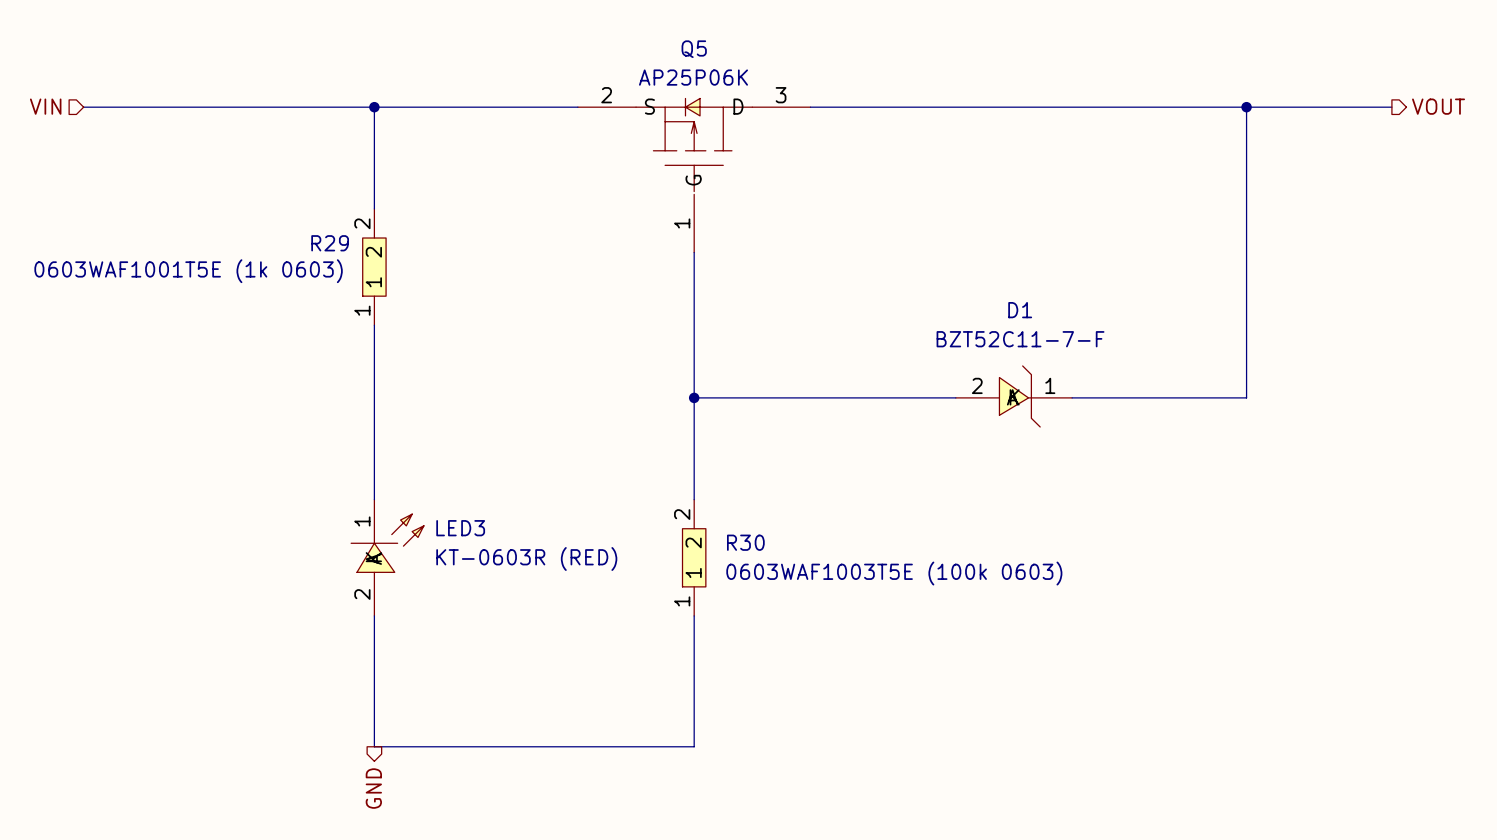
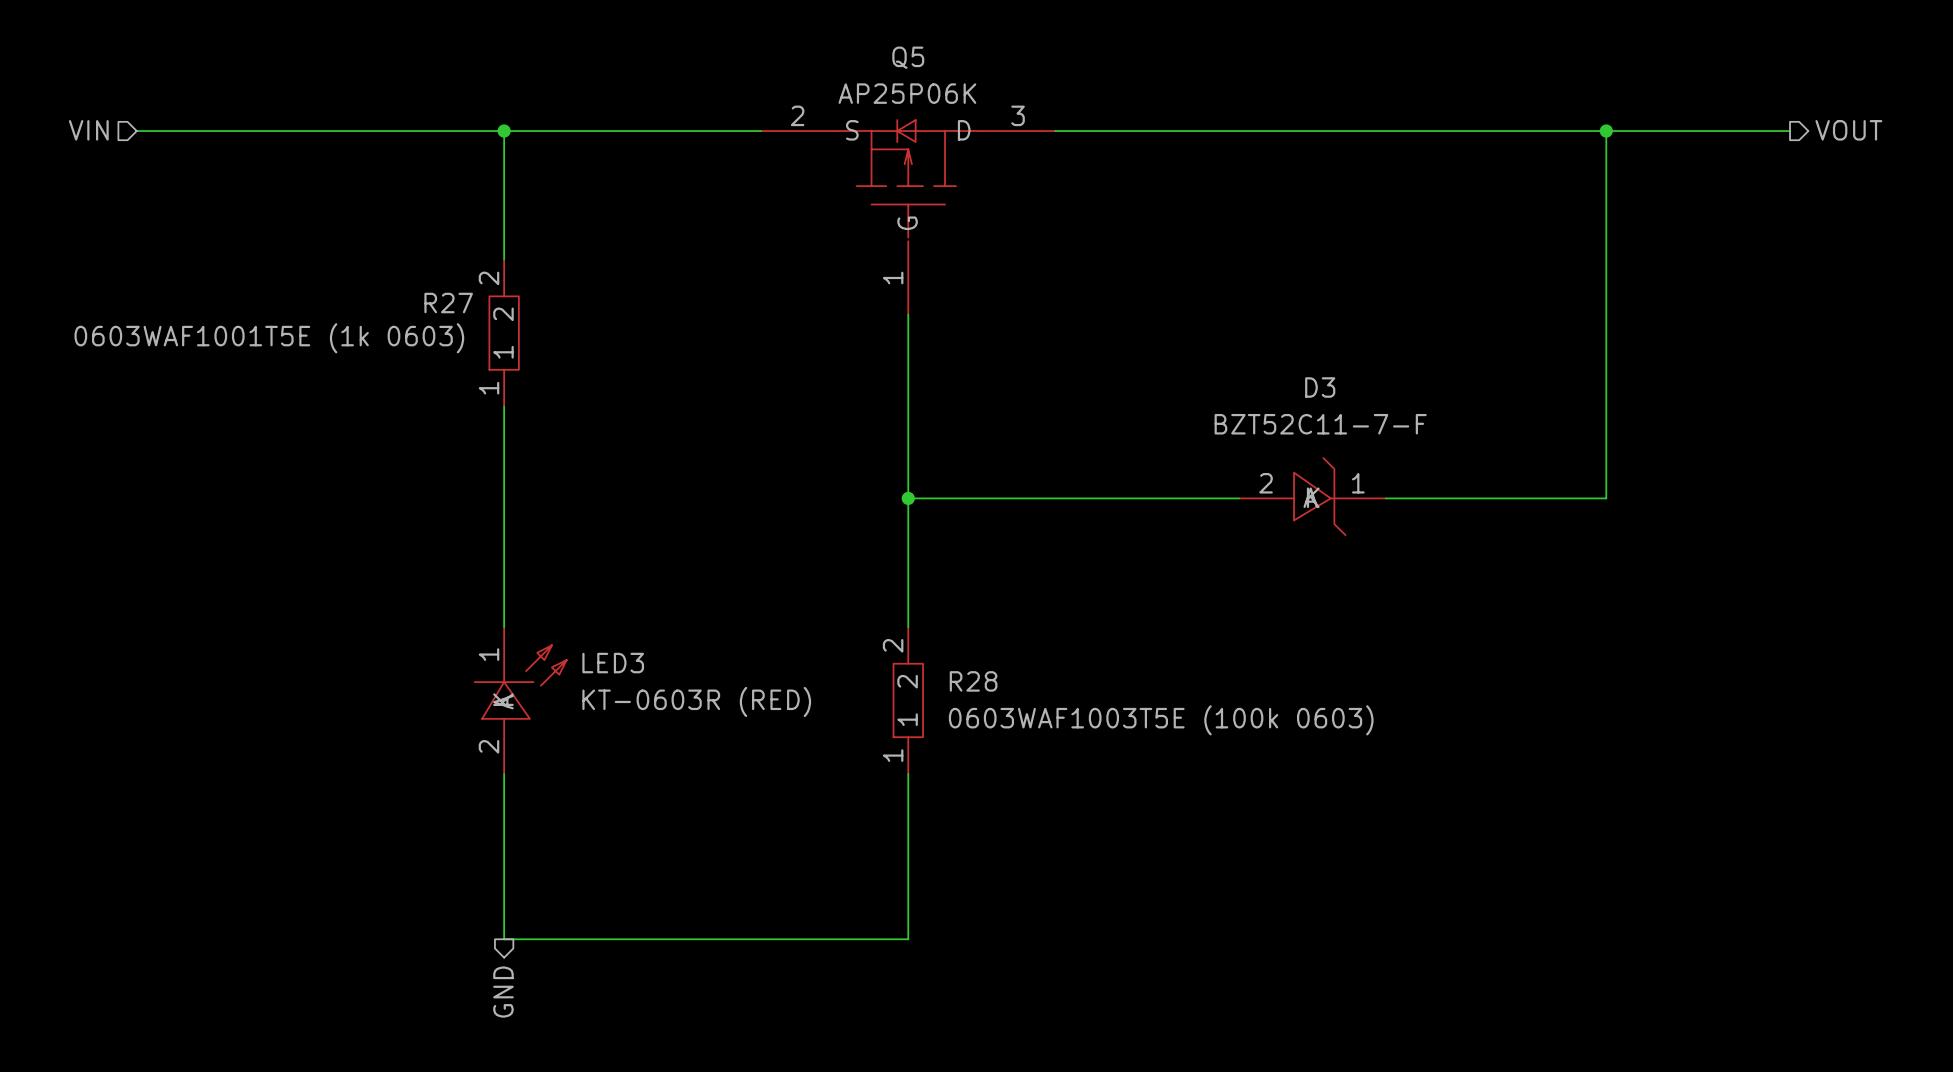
R29 name: R29 (330, 243) -> R27 (448, 303)
D1 name: D1 (1020, 310) -> D3 (1320, 387)
R30 name: R30 (745, 542) -> R28 (973, 681)

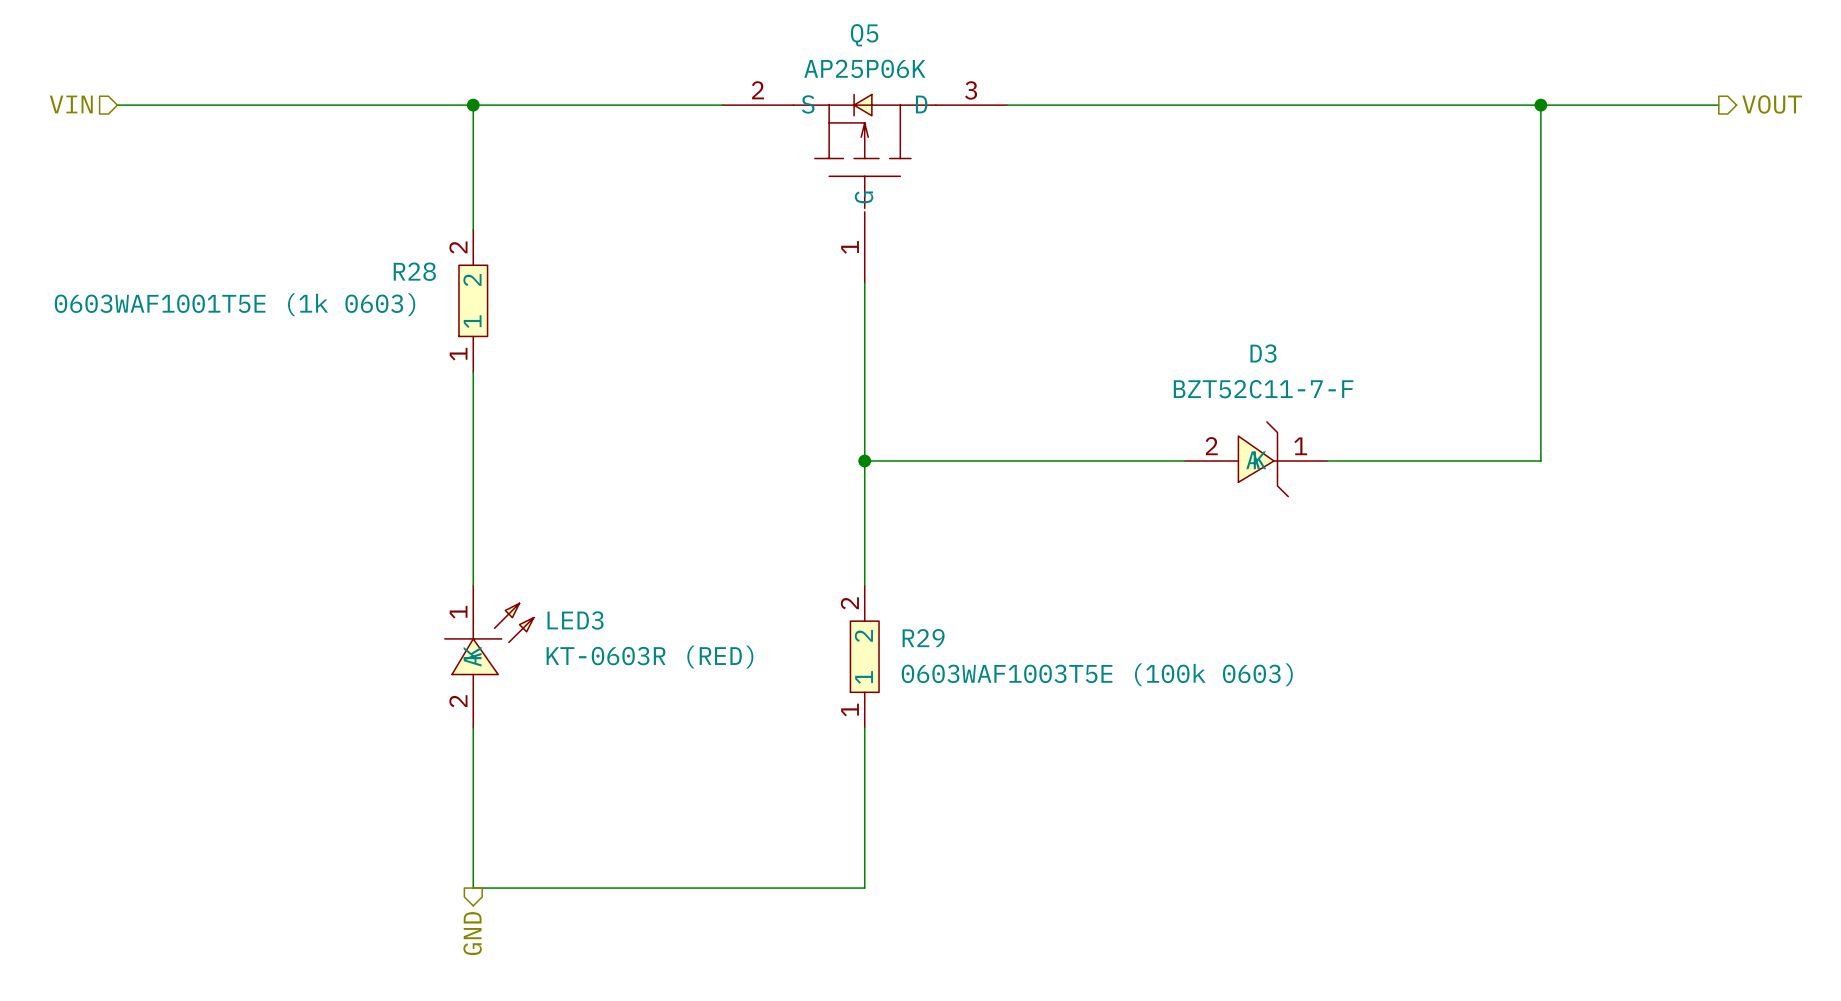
R27 name: R27 (448, 303) -> R28 (414, 271)
R28 name: R28 (973, 681) -> R29 (923, 638)

